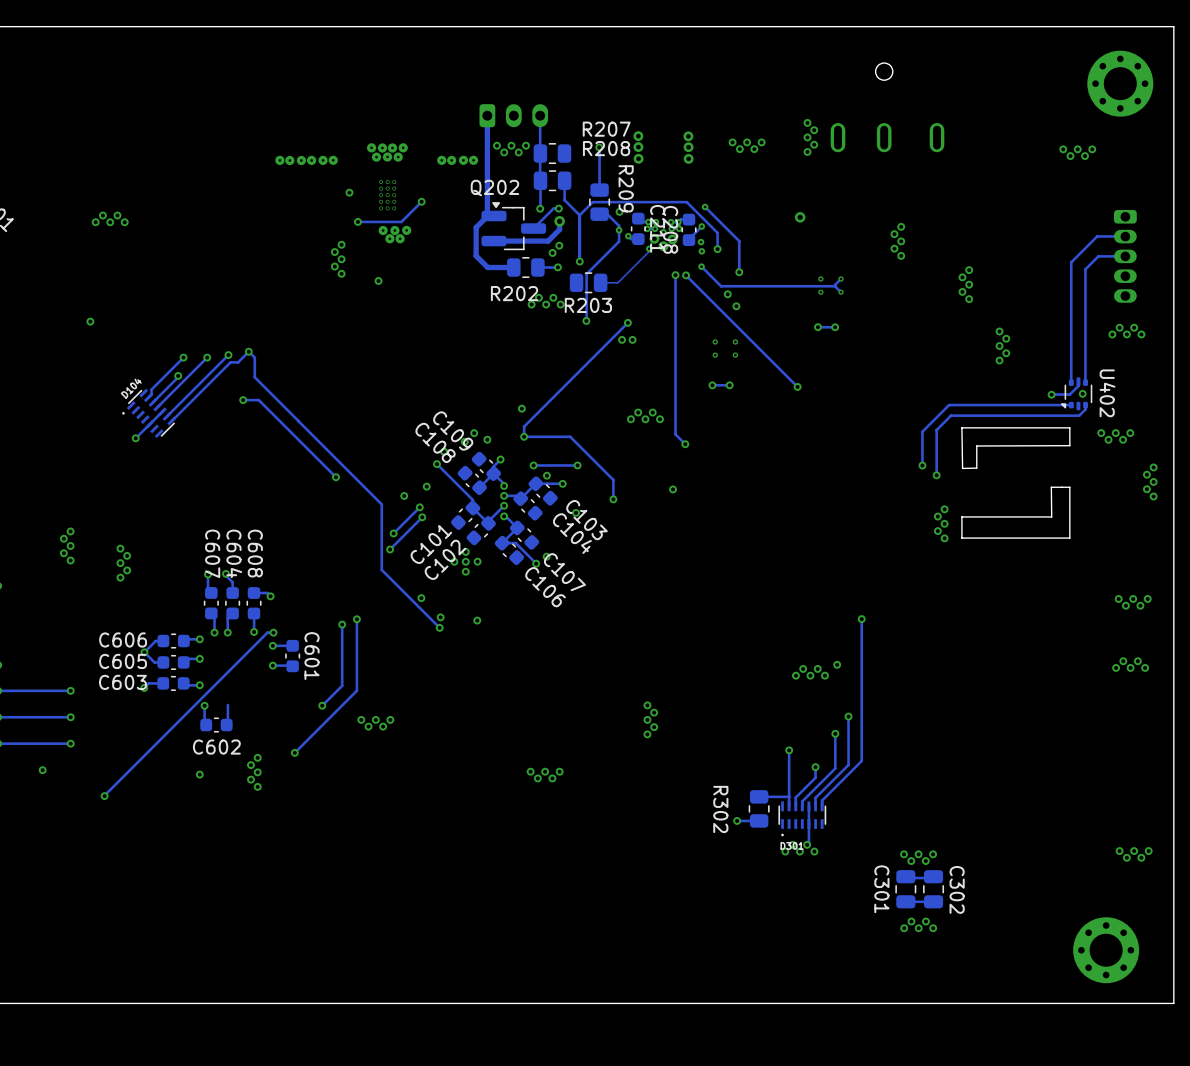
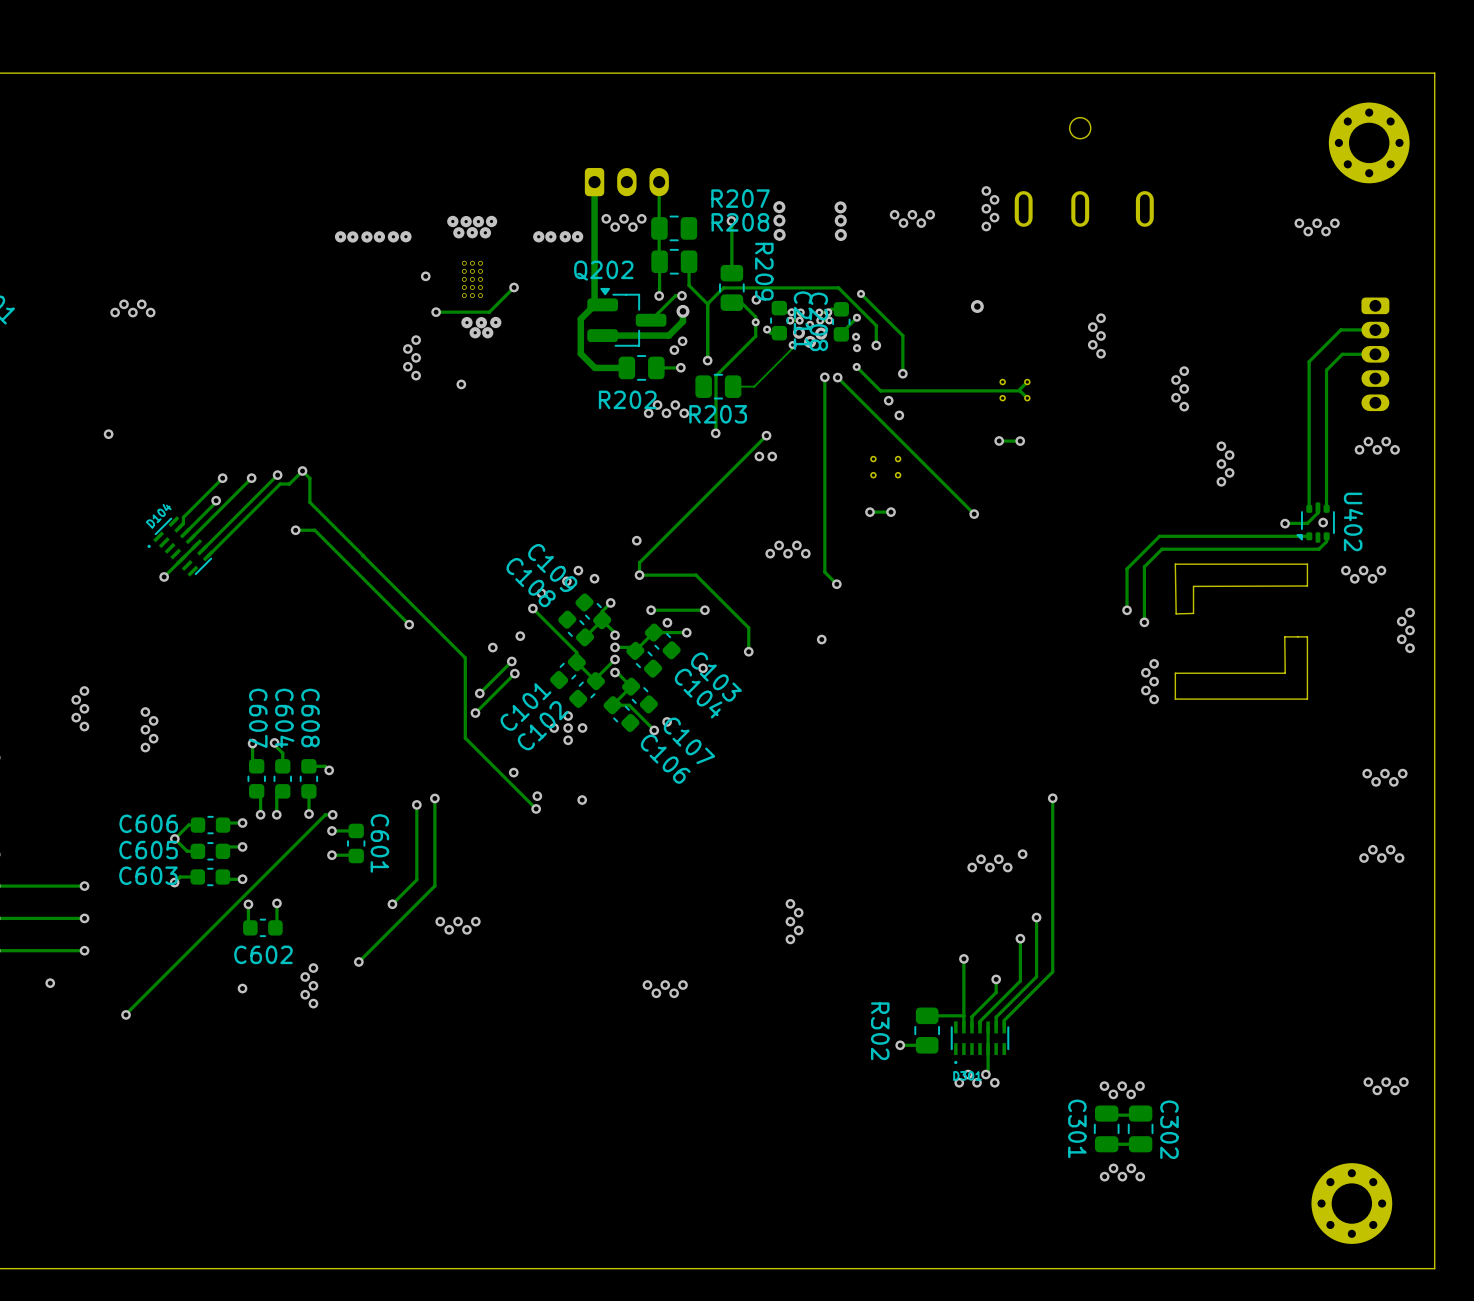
via: none -> (276, 903)

